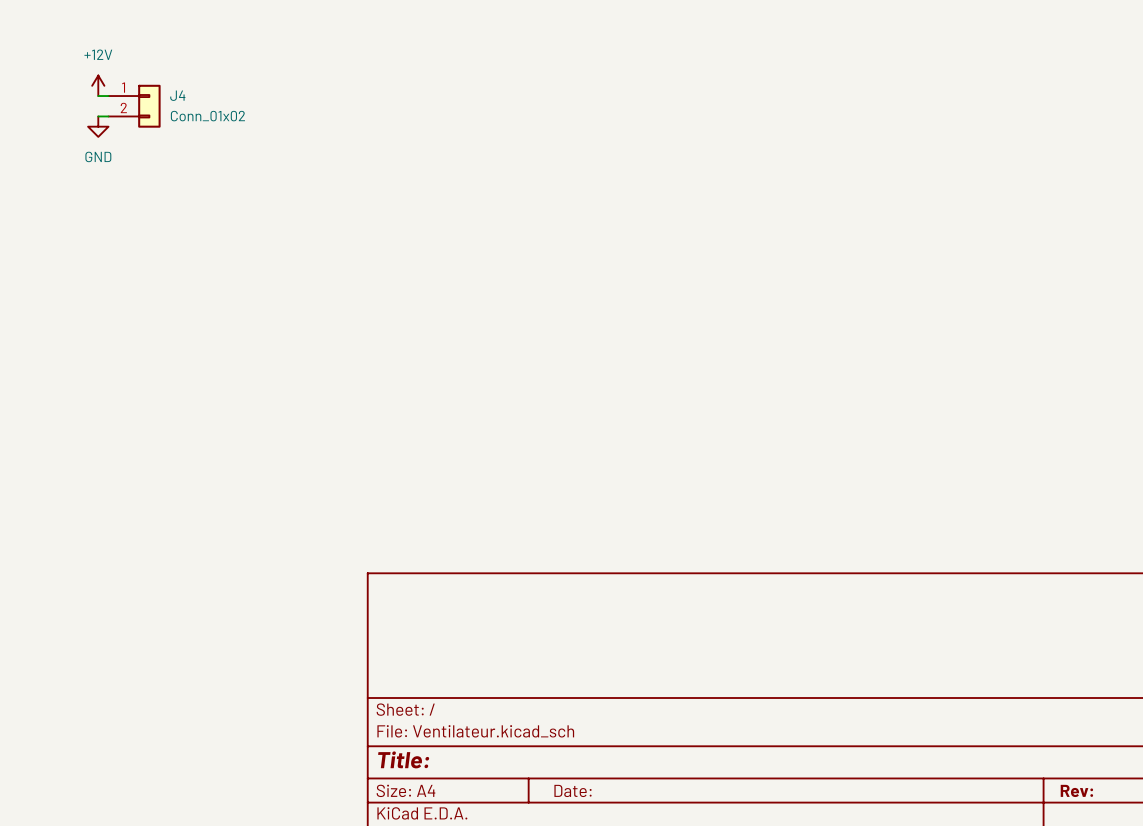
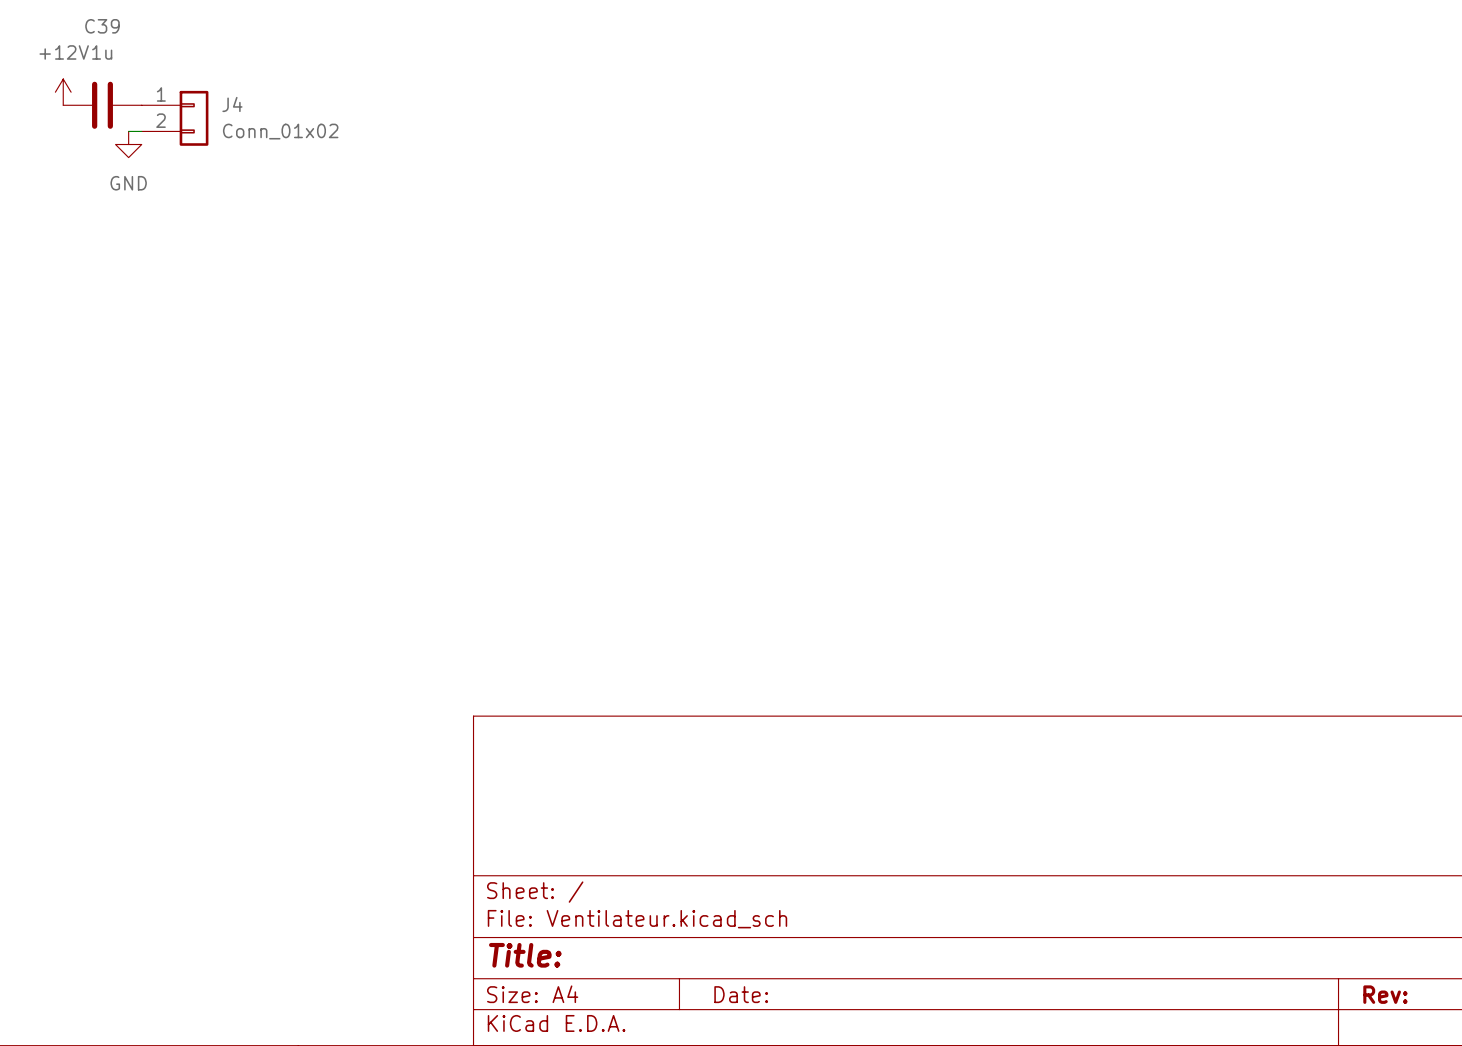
power symbol position: +12V (98, 85) -> +12V (63, 92)
C39: none -> 1u (102, 105)

